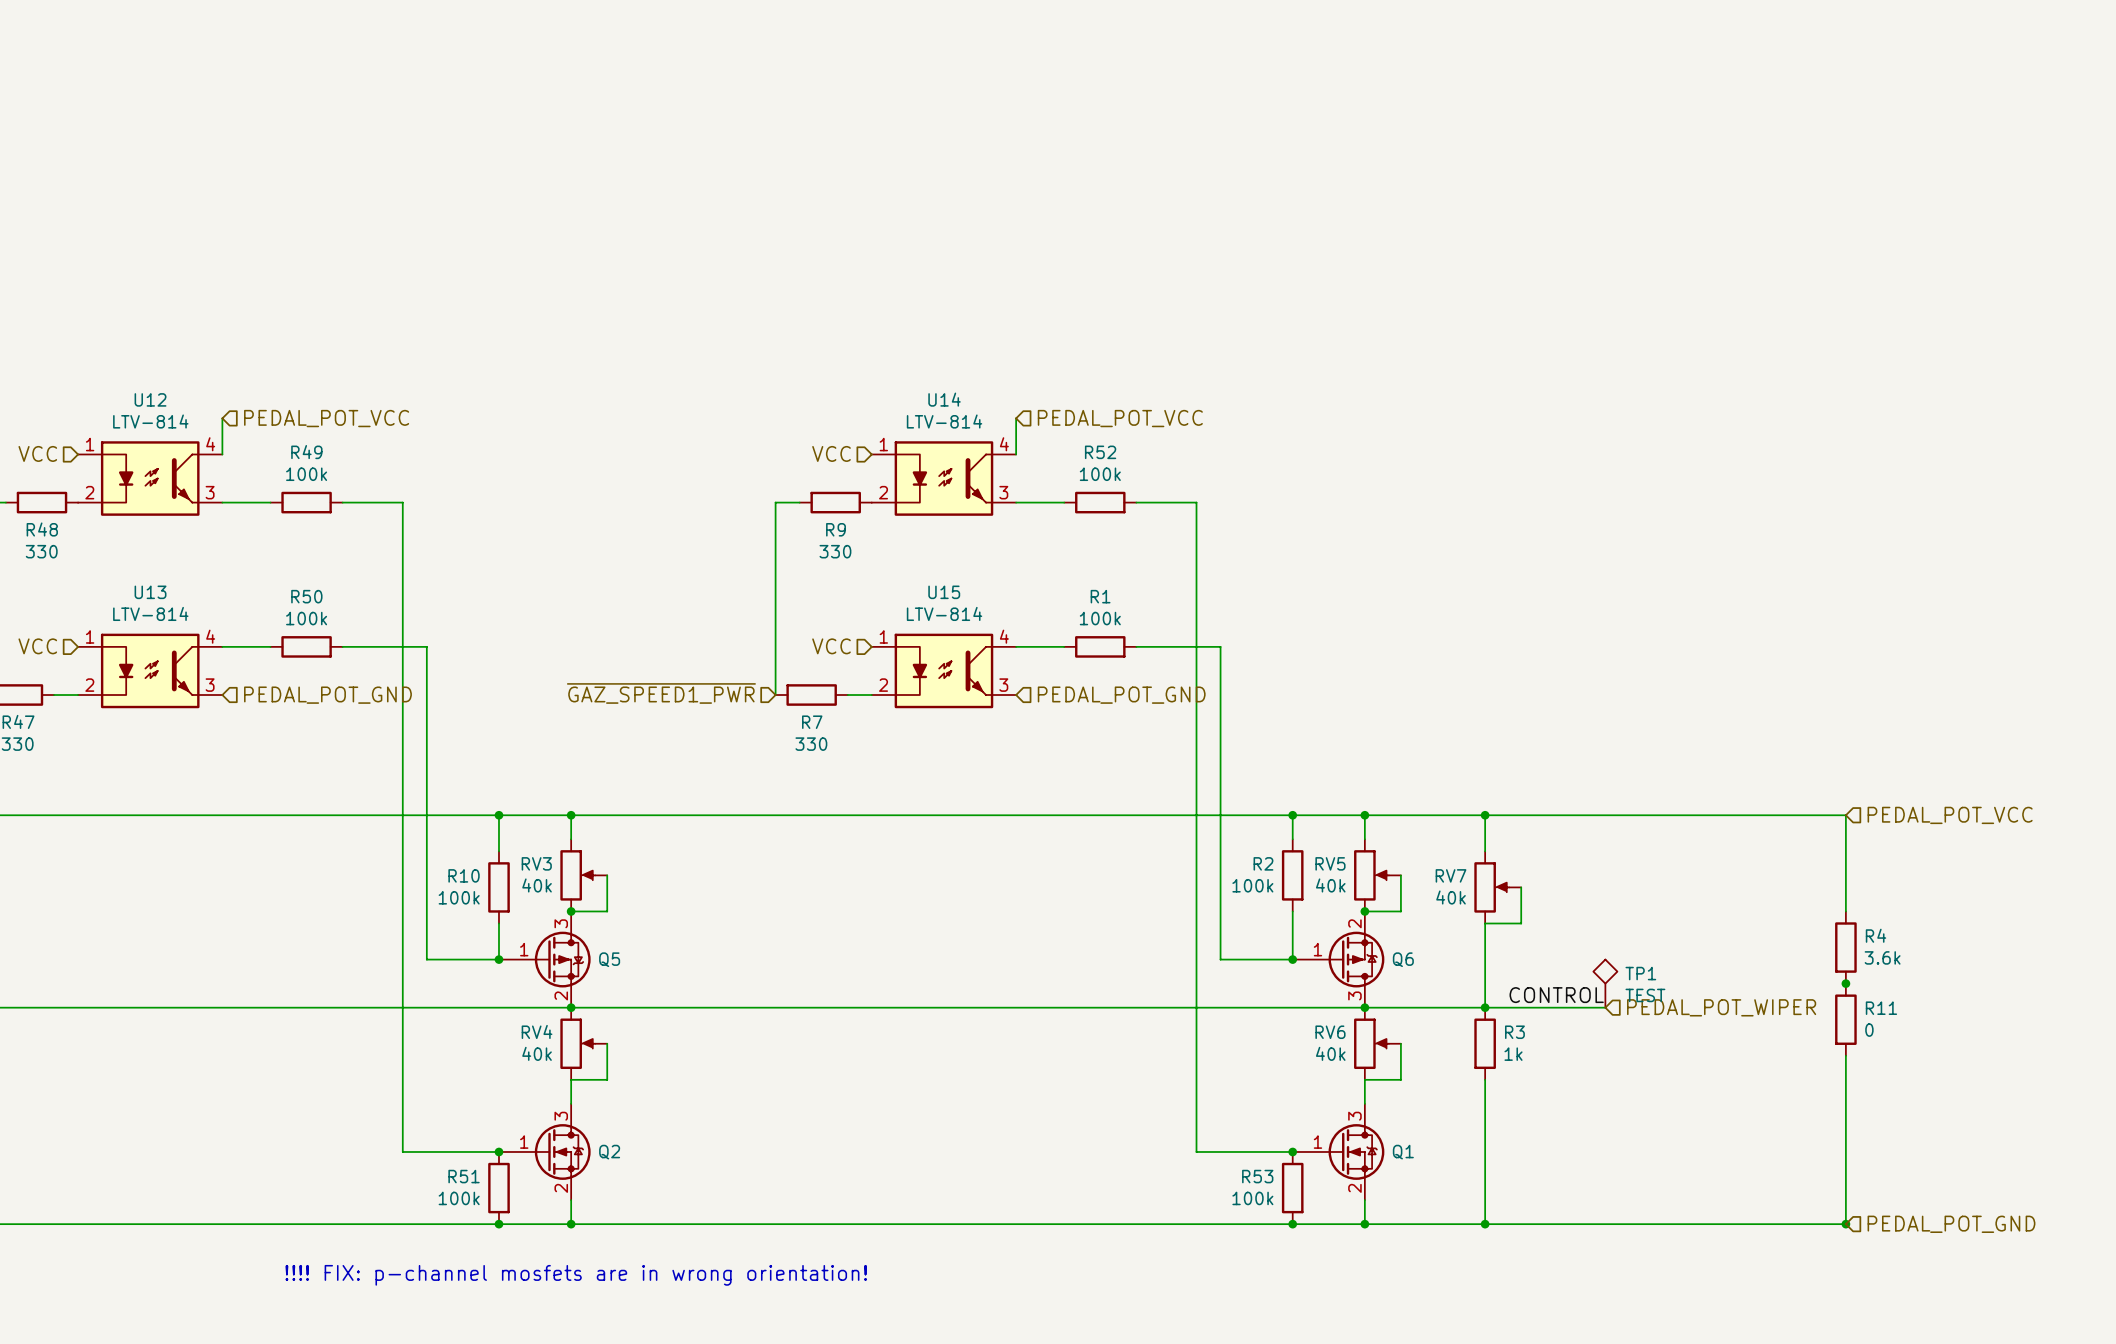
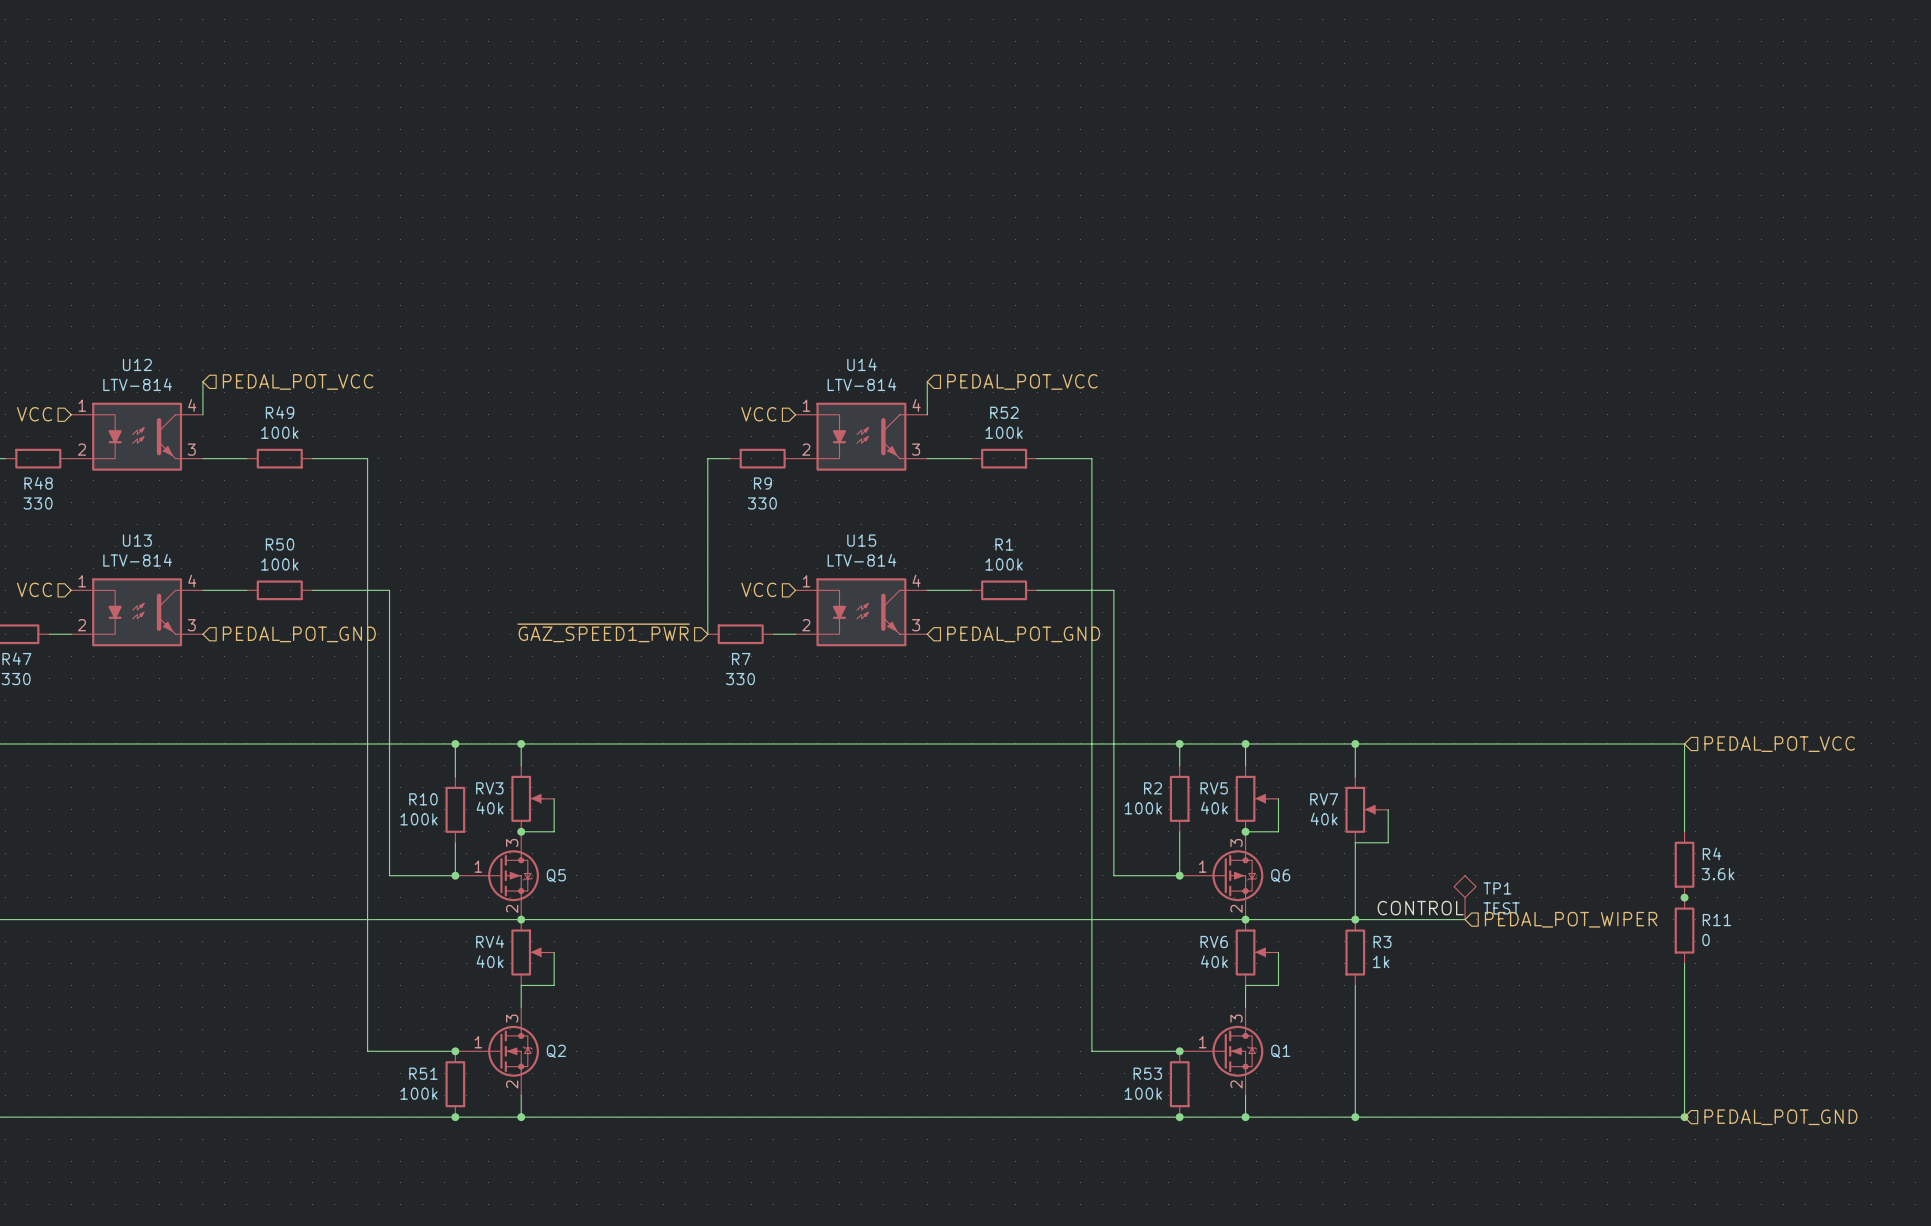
Q6 flip: as is (1356, 959) -> up-down (1237, 875)
text: !!!! FIX: p-channel mosfets are in wrong orientation! (576, 1275) -> none

